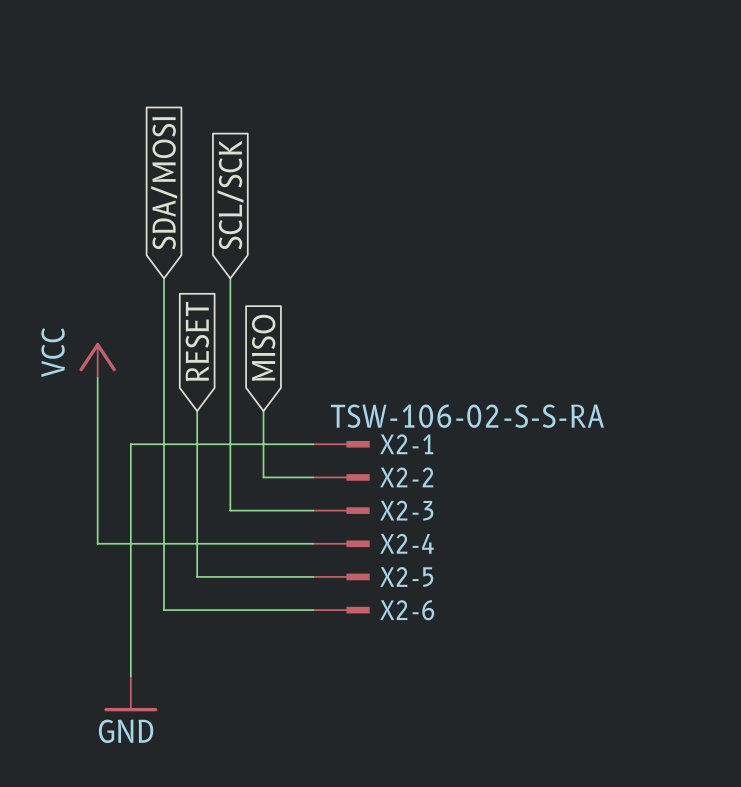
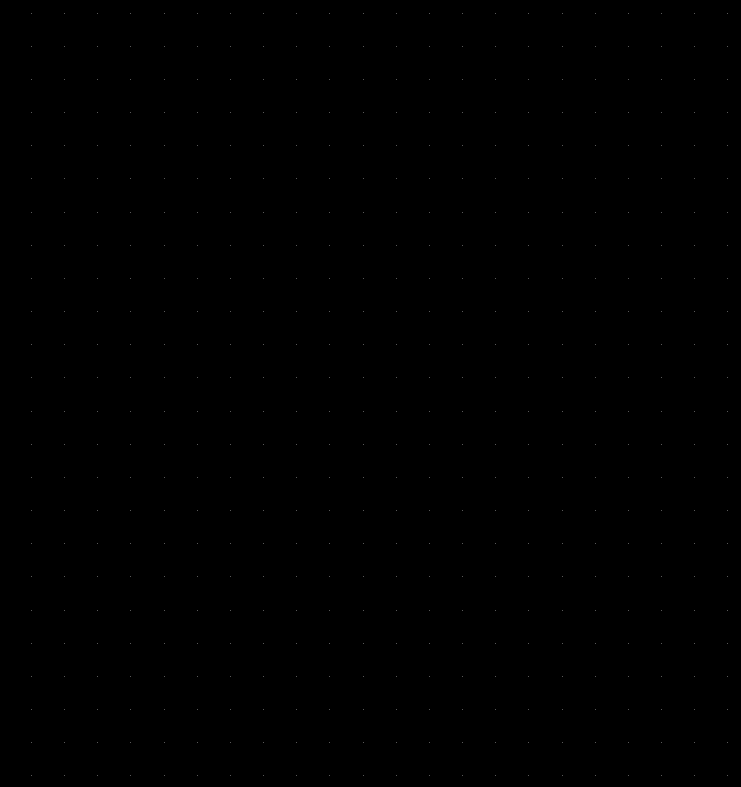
global label: SDA/MOSI (164, 183) -> none
global label: SCL/SCK (230, 195) -> none
wire: (164, 278) (164, 610) (313, 610) -> none
wire: (230, 278) (230, 510) (313, 510) -> none
global label: RESET (197, 341) -> none
global label: MISO (263, 347) -> none
power symbol: VCC (97, 360) -> none
wire: (97, 377) (97, 543) (313, 543) -> none
wire: (197, 411) (197, 576) (313, 576) -> none
wire: (263, 411) (263, 477) (313, 477) -> none
wire: (313, 444) (130, 444) (130, 676) -> none
X2-1: TSW-106-02-S-S-RA (341, 444) -> none
X2-2: (341, 477) -> none
X2-3: (341, 510) -> none
X2-4: (341, 543) -> none
X2-5: (341, 576) -> none
X2-6: (341, 610) -> none
power symbol: GND (130, 693) -> none

